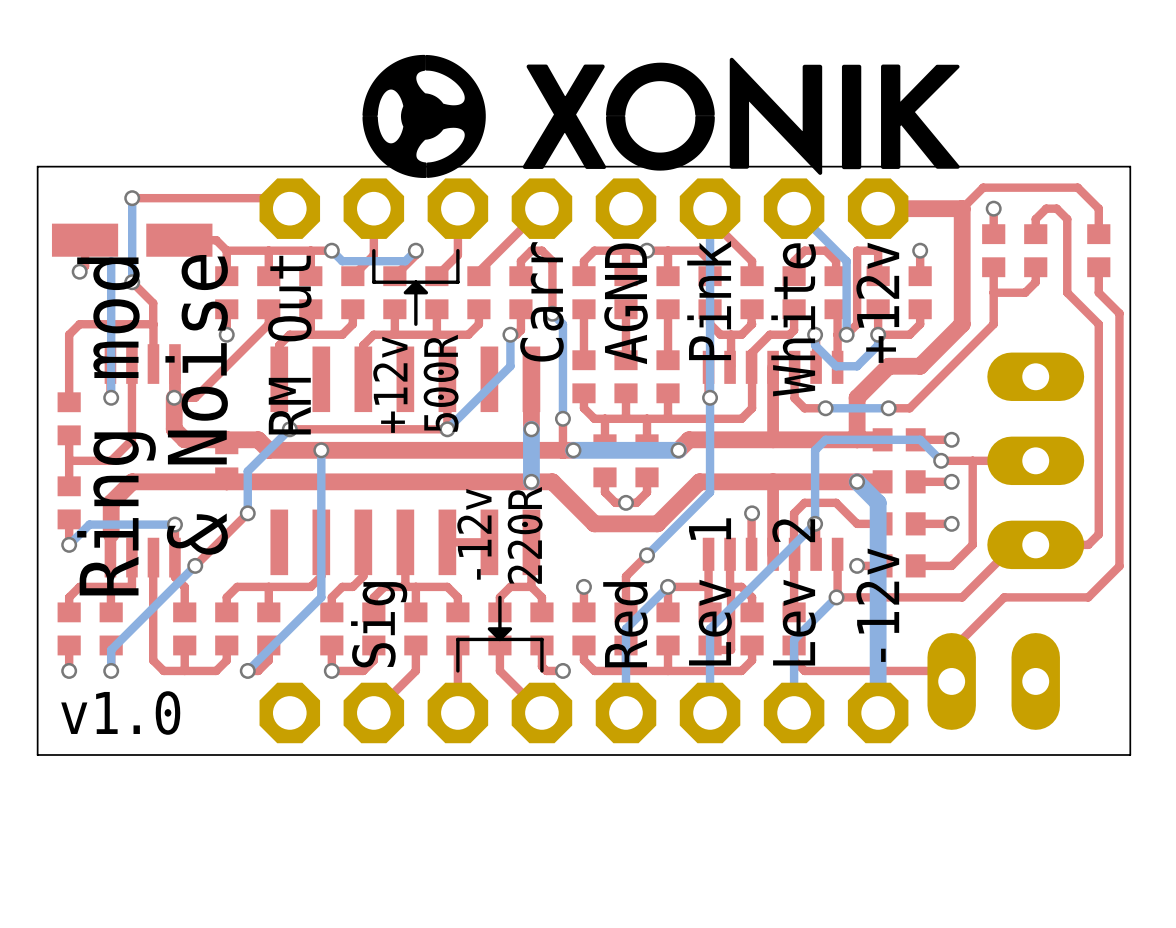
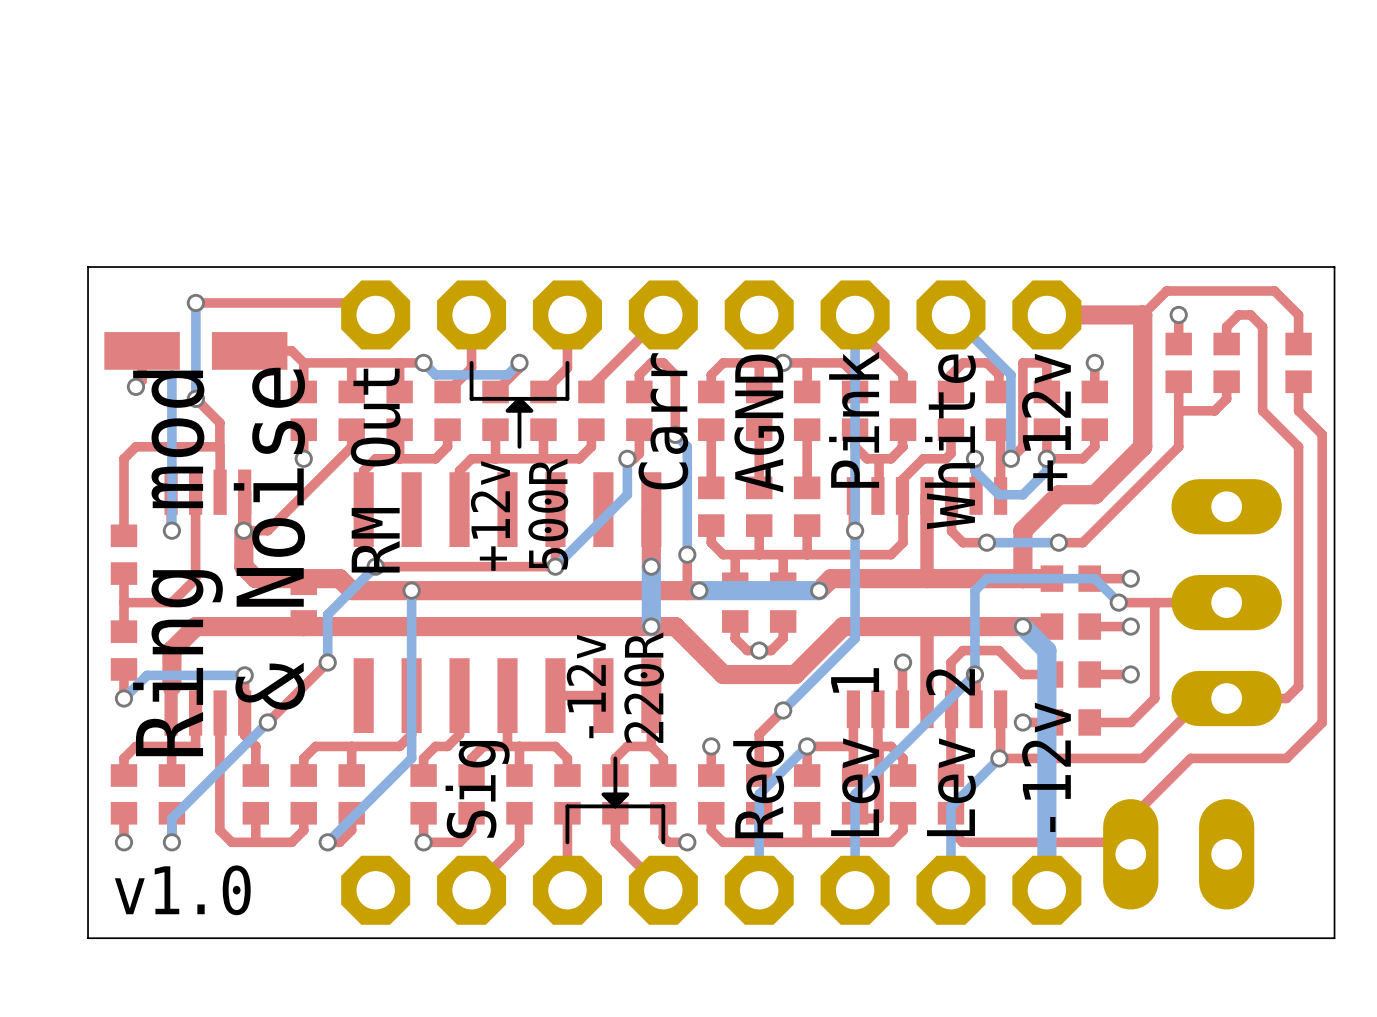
drawing: [362, 54, 960, 178] -> none

